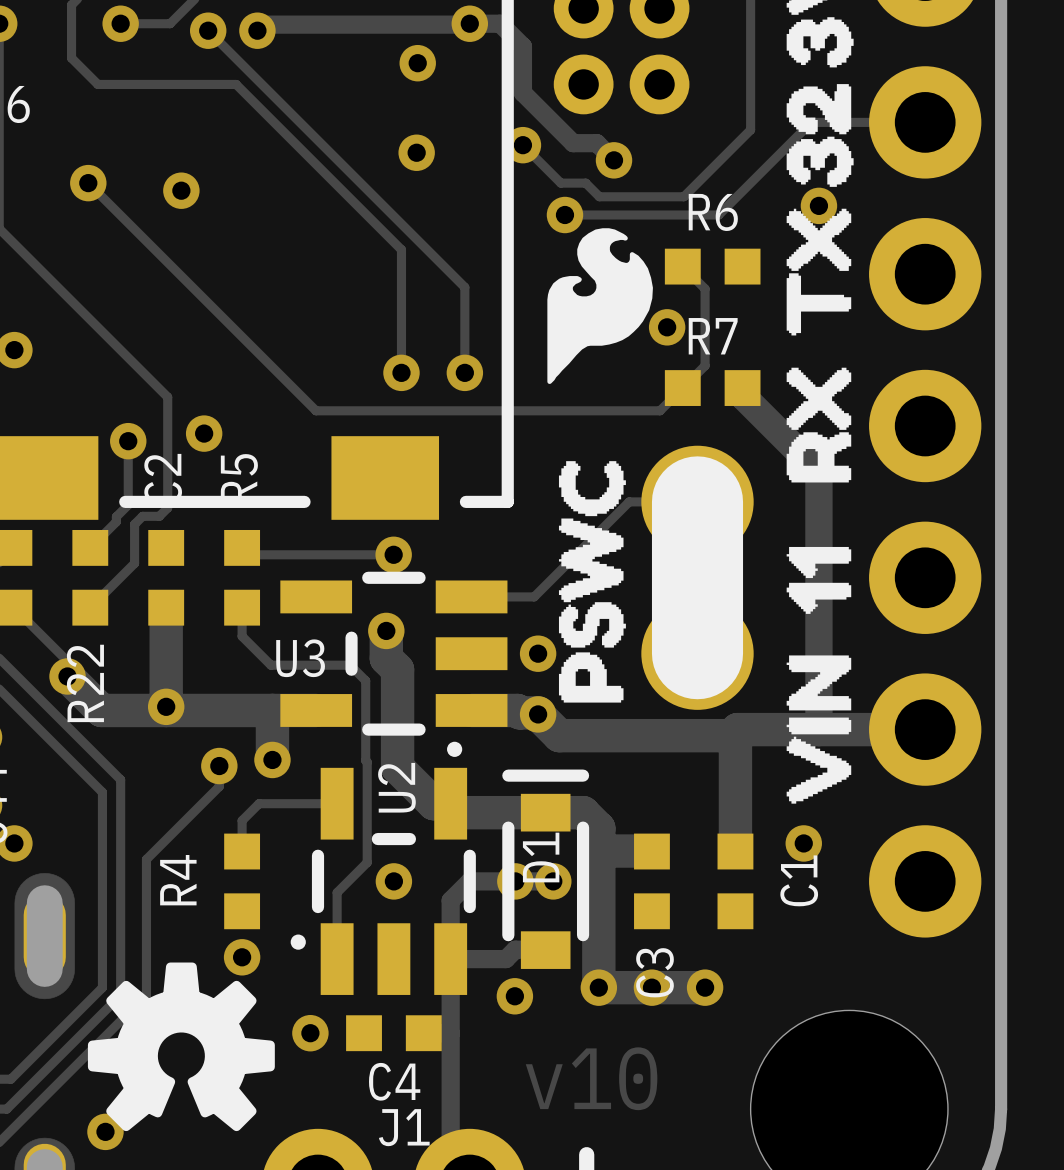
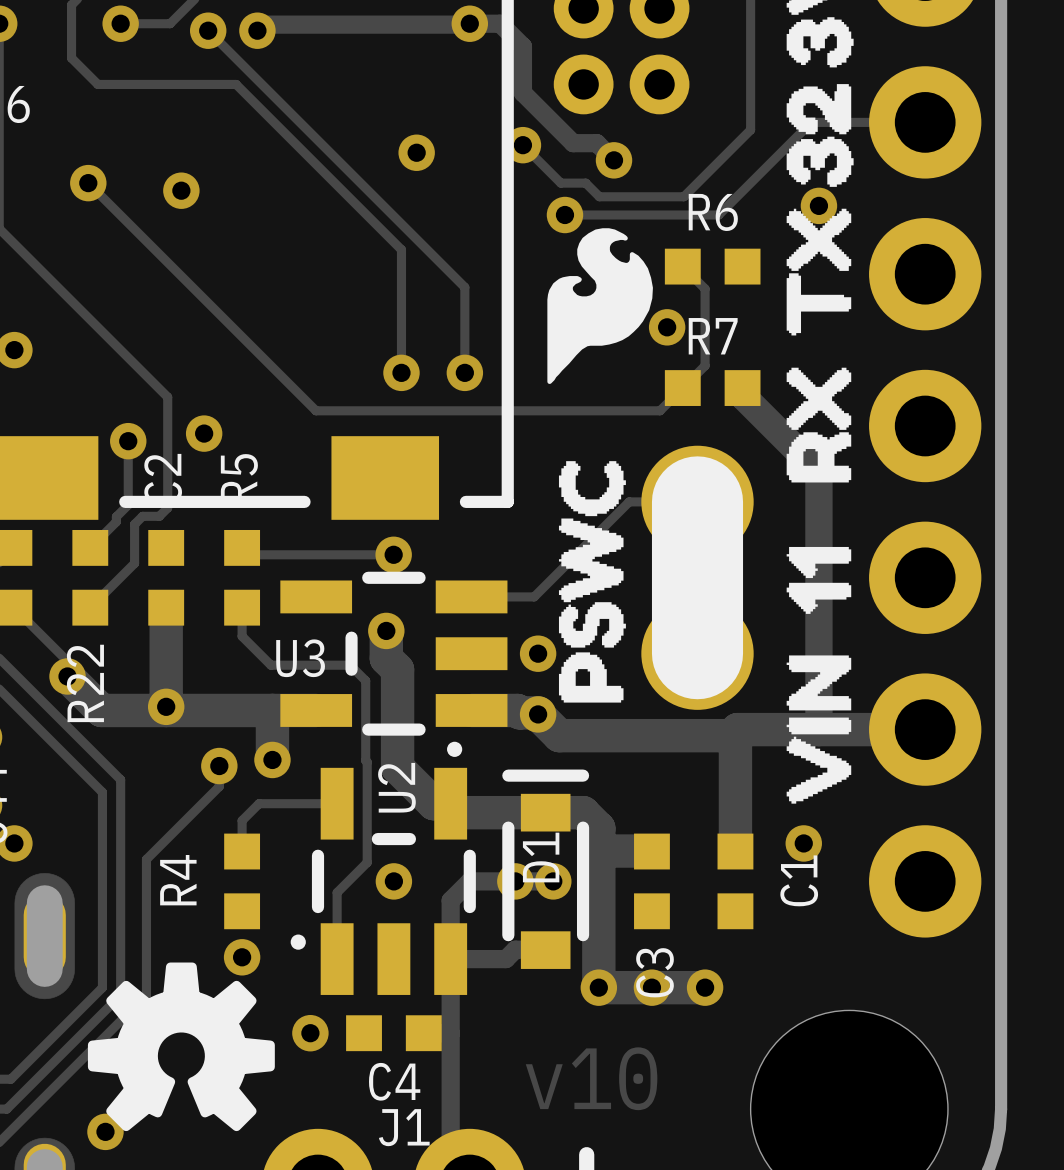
via: (417, 63) -> none
via: (514, 996) -> none

